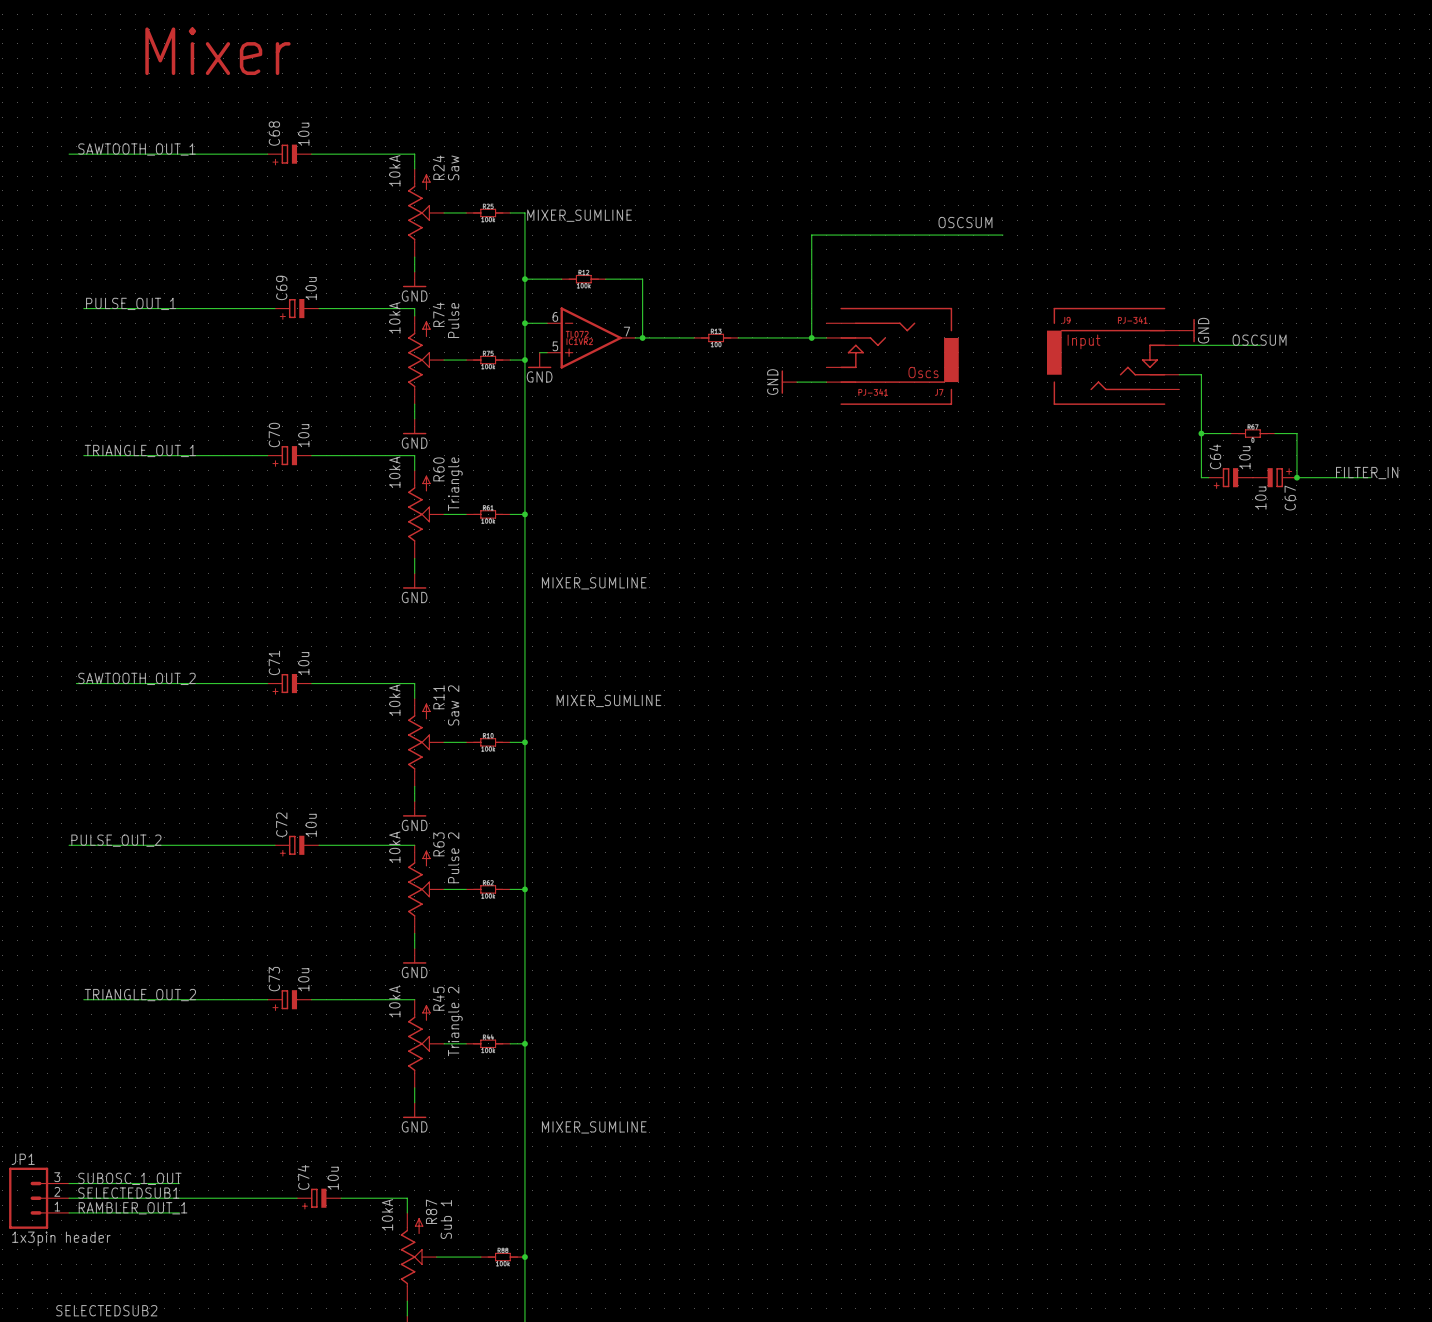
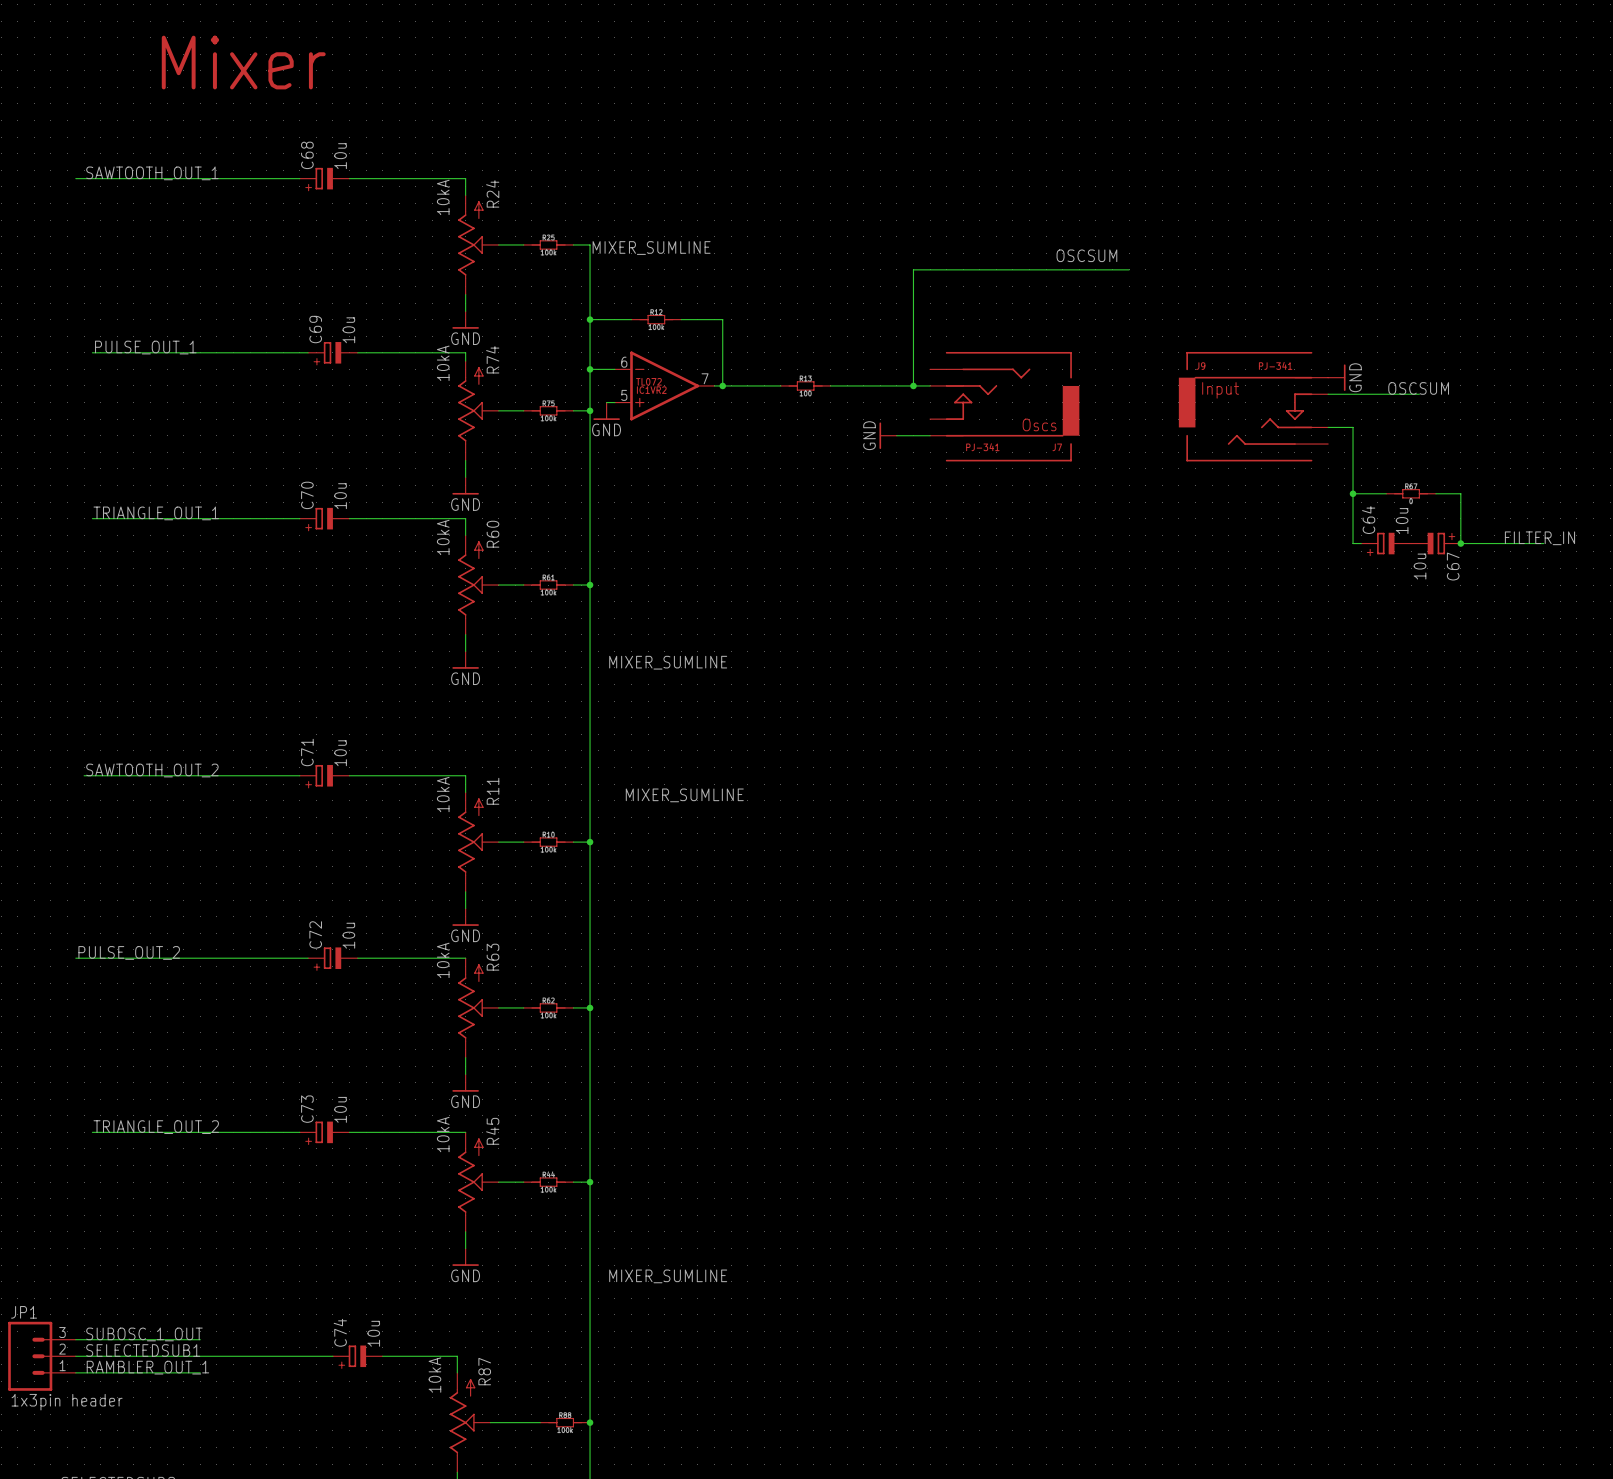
R24 text: Saw (453, 167) -> none
R74 text: Pulse (453, 320) -> none
R60 text: Triangle (455, 484) -> none
R11 text: Saw 2 (453, 705) -> none
R63 text: Pulse 2 (453, 857) -> none
R45 text: Triangle 2 (455, 1021) -> none
R87 text: Sub 1 (446, 1219) -> none

